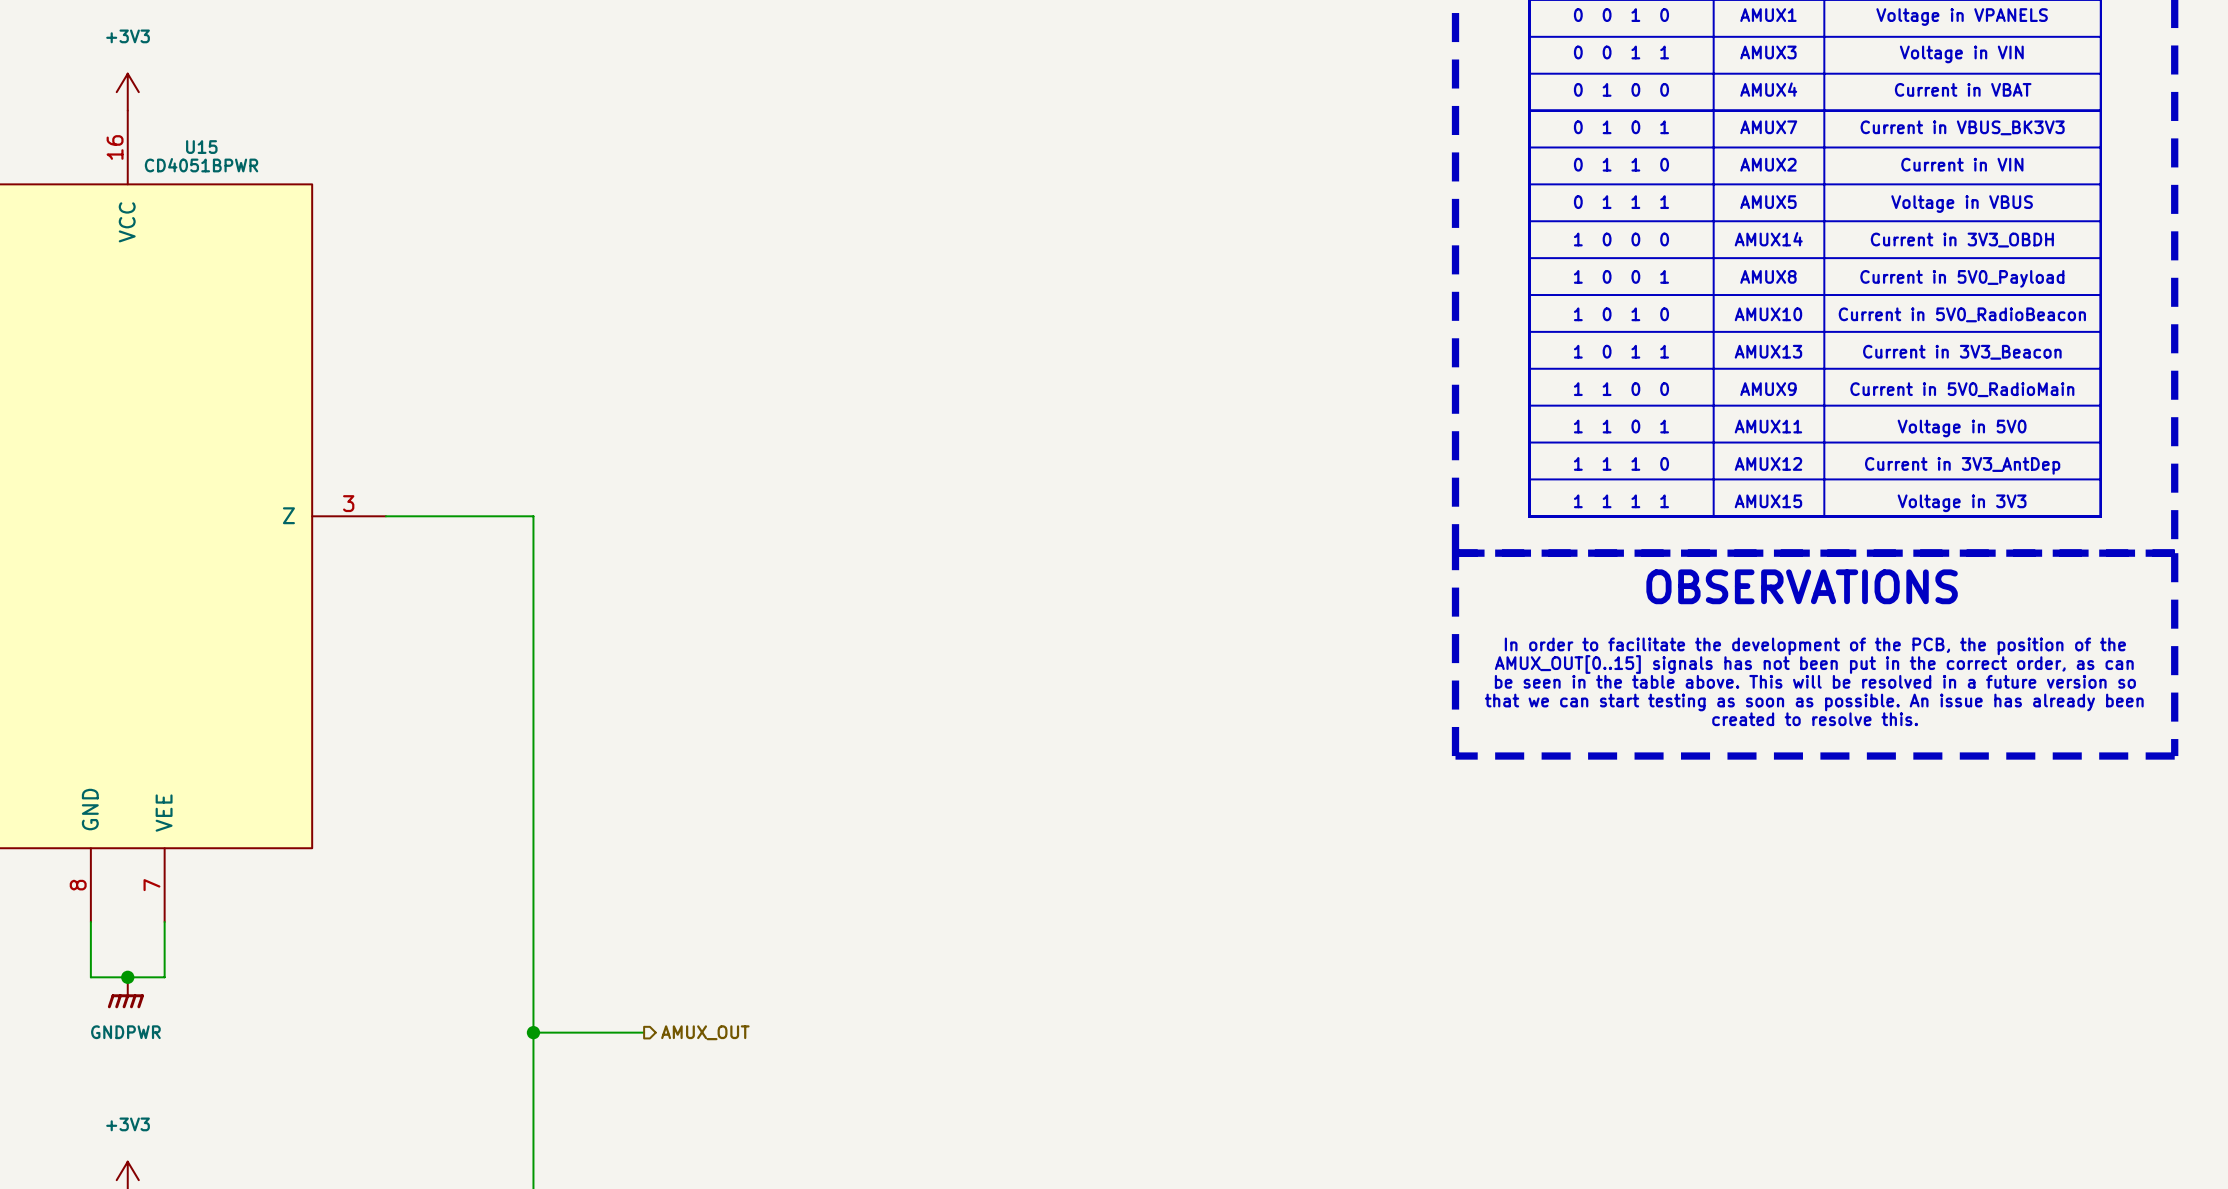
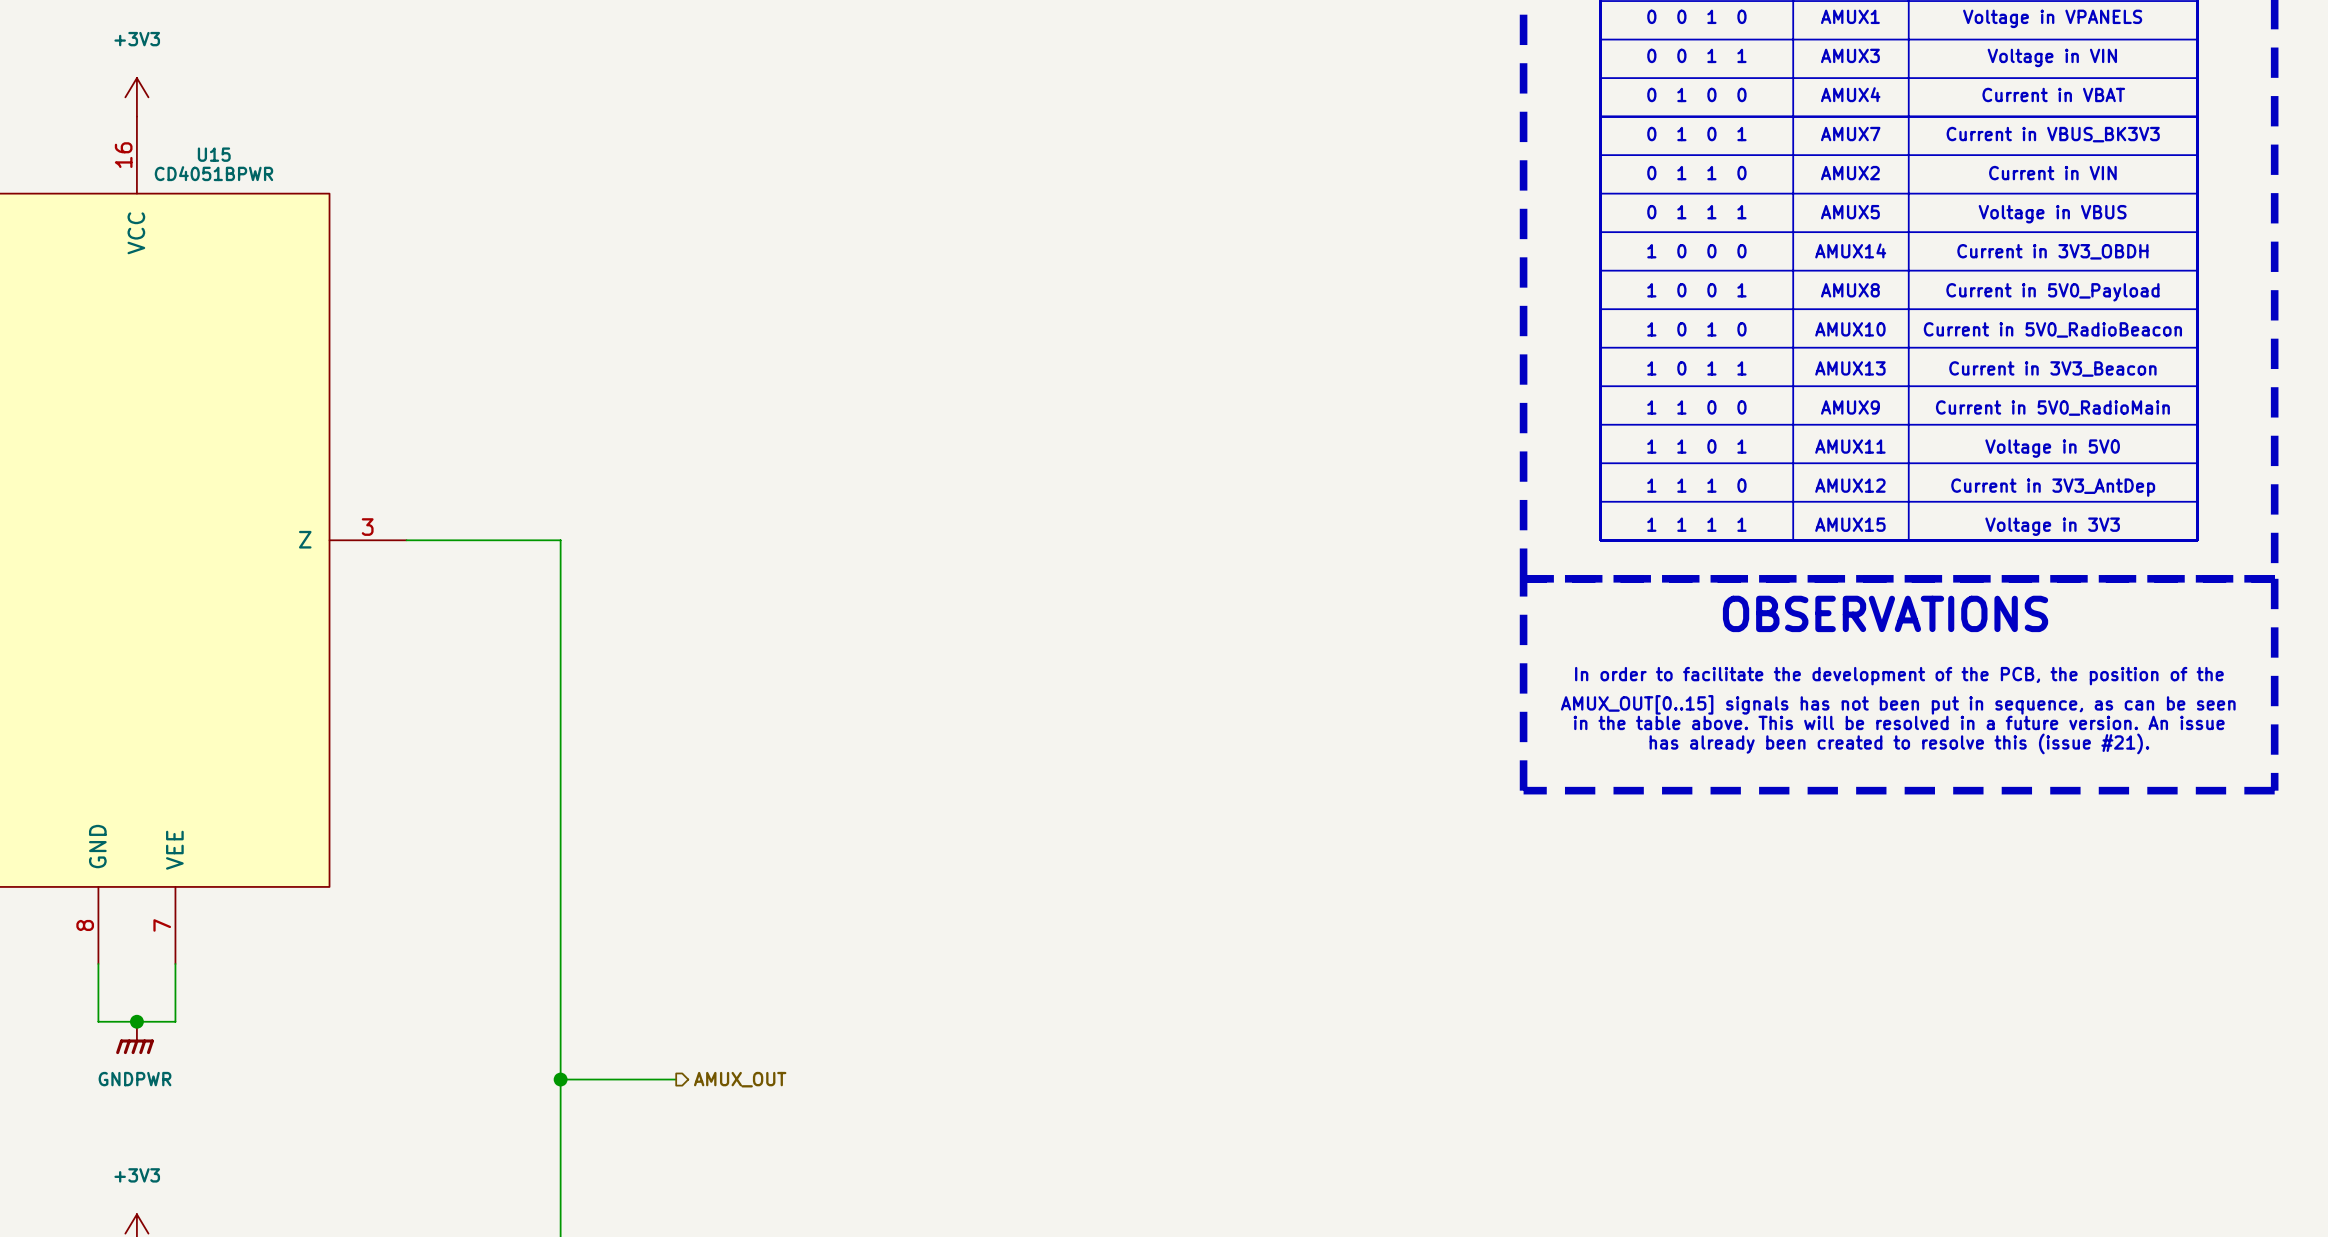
text: AMUX_OUT[0..15] signals has not been put in the correct order, as can (1814, 664) -> AMUX_OUT[0..15] signals has not been put in sequence, as can be seen (1898, 704)
text: be seen in the table above. This will be resolved in a future version so (1815, 681) -> in the table above. This will be resolved in a future version. An issue (1899, 722)
text: that we can start testing as soon as possible. An issue has already been (1814, 702) -> none
text: created to resolve this. (1815, 719) -> has already been created to resolve this (issue #21). (1899, 743)

